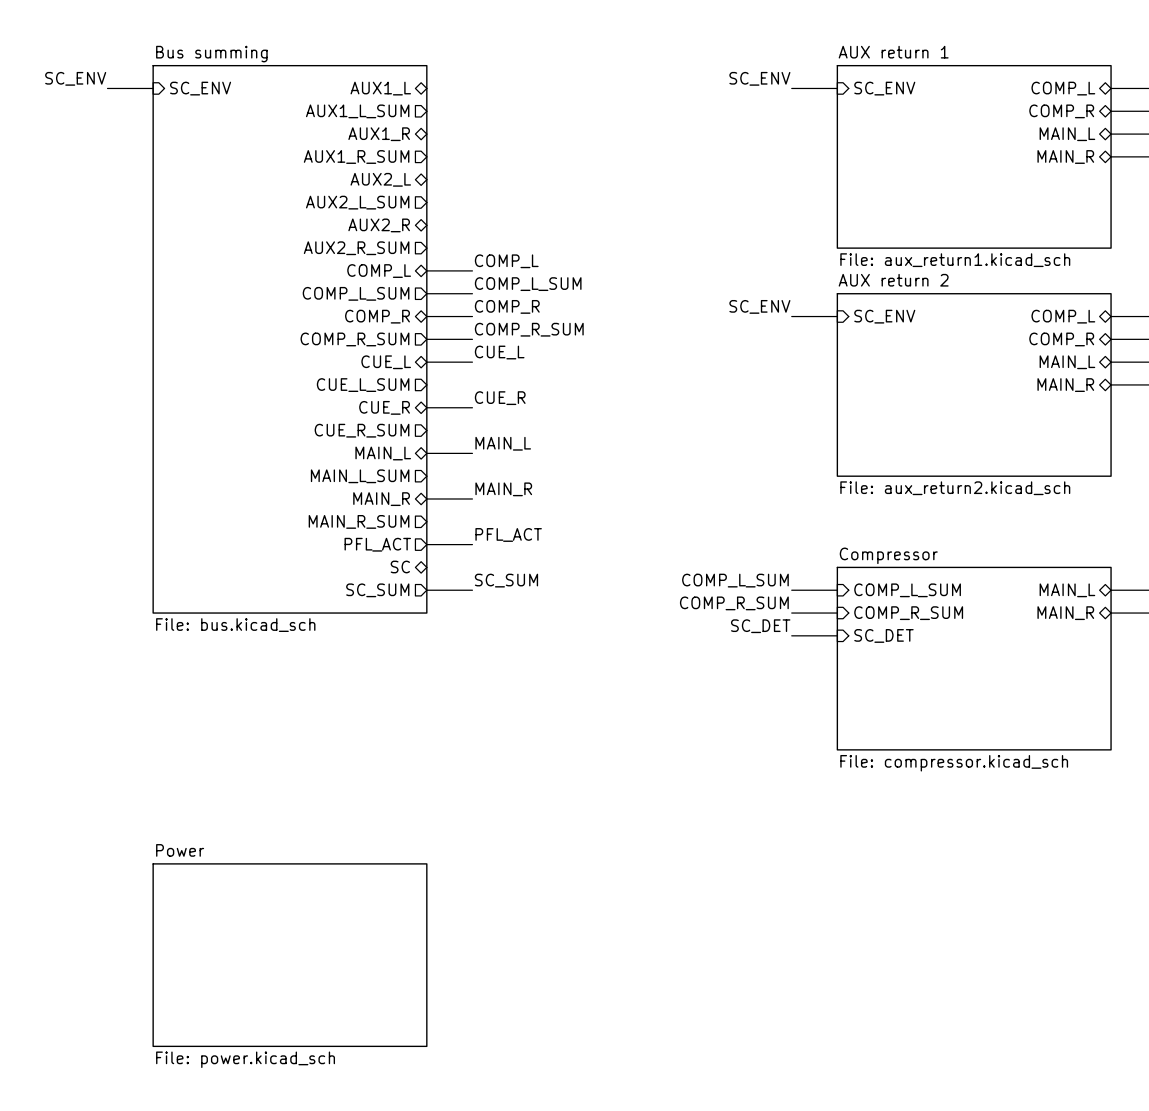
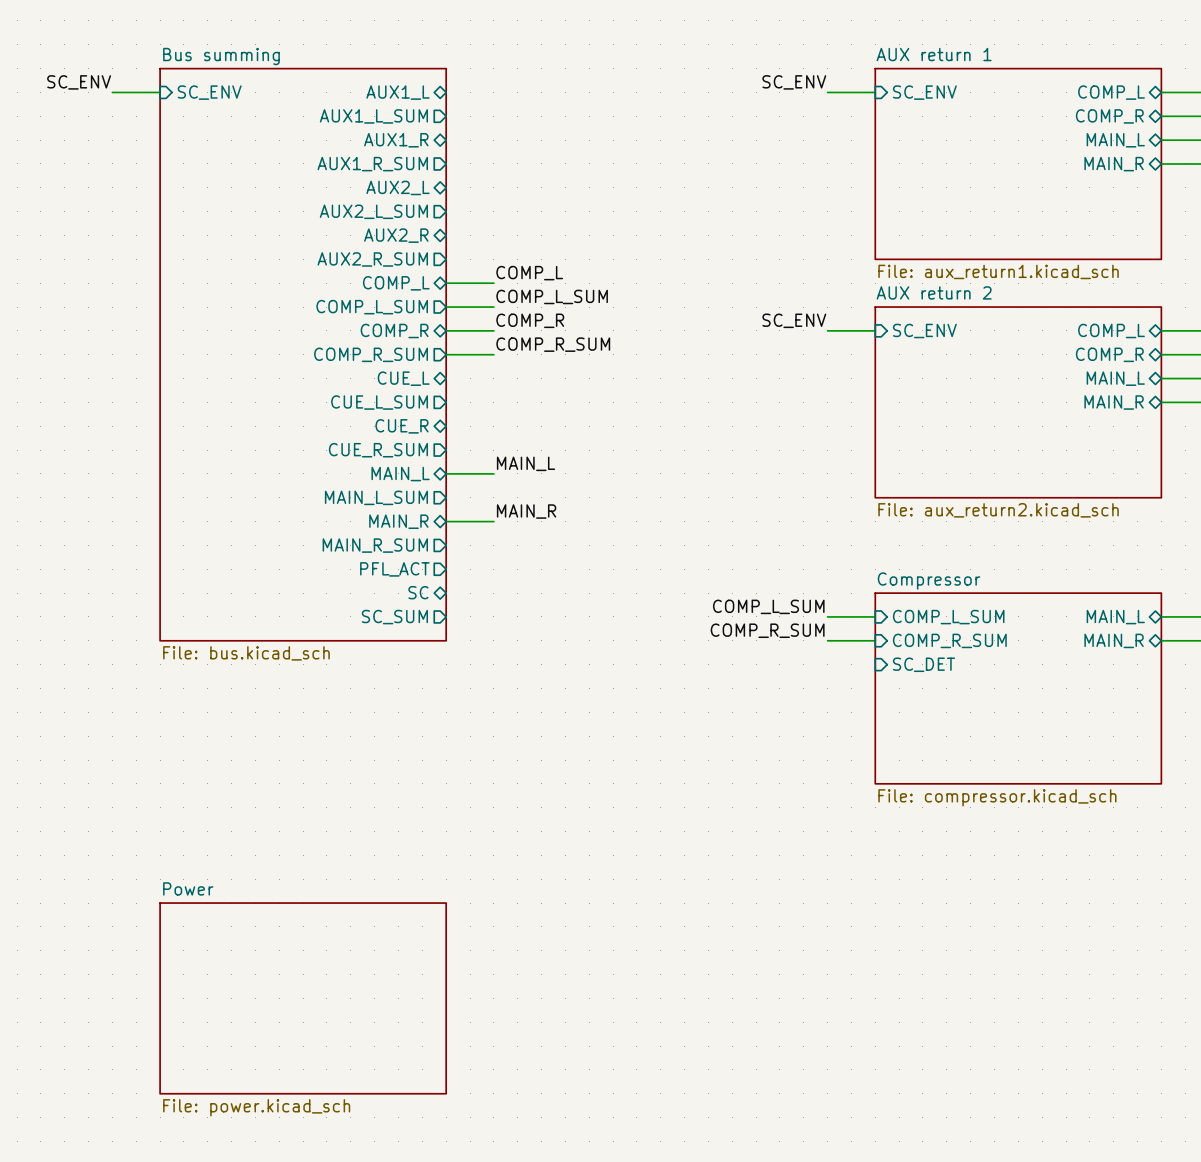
label: CUE_L (499, 352) -> none
wire: (426, 362) (472, 362) -> none
label: CUE_R (500, 398) -> none
wire: (426, 407) (472, 407) -> none
label: PFL_ACT (508, 534) -> none
wire: (426, 544) (472, 544) -> none
label: SC_SUM (506, 580) -> none
wire: (426, 590) (472, 590) -> none
label: SC_DET (760, 626) -> none
wire: (791, 635) (837, 635) -> none

